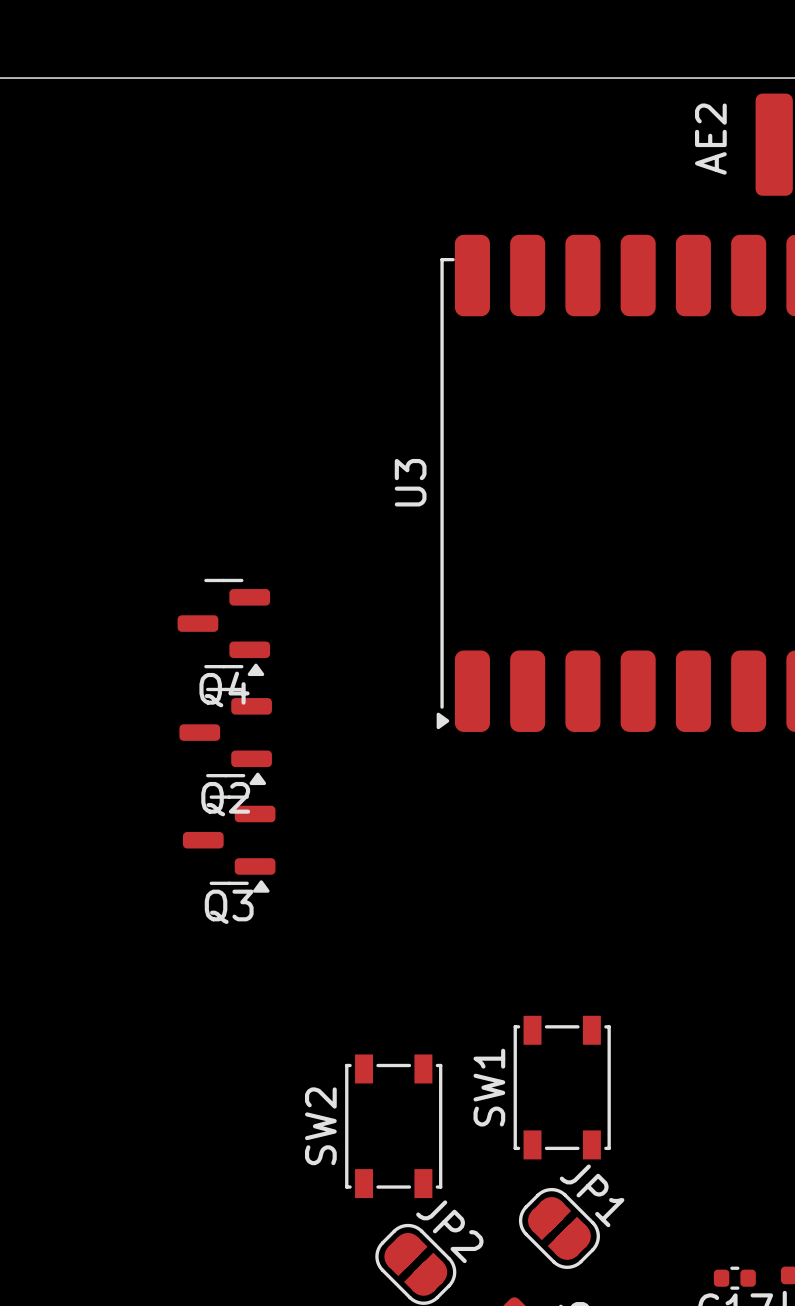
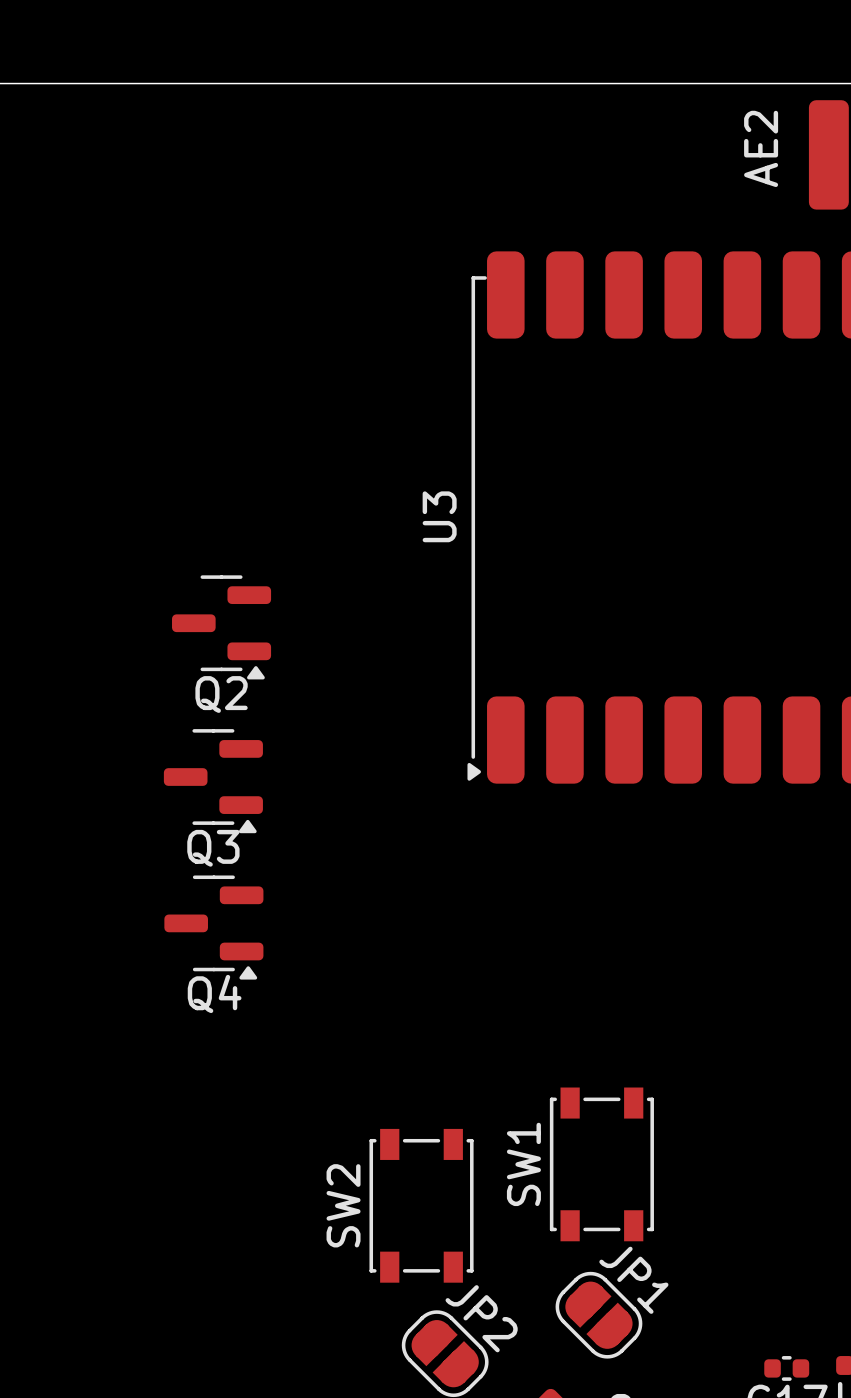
Q4 position: (223, 627) -> (213, 927)
Q2 position: (225, 736) -> (221, 627)
Q3 position: (229, 844) -> (213, 781)

